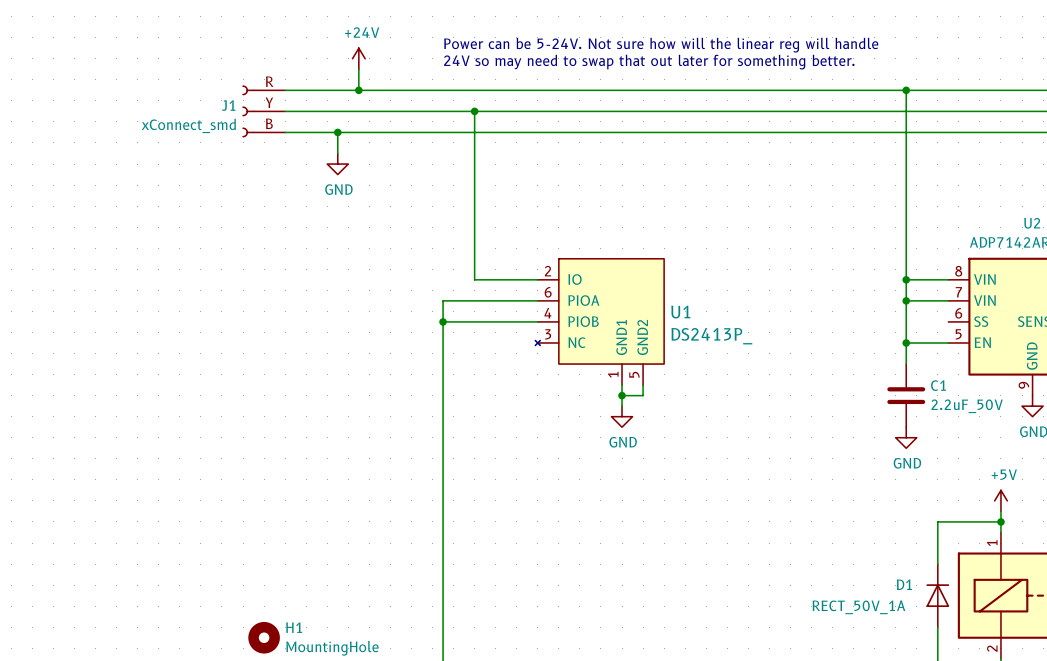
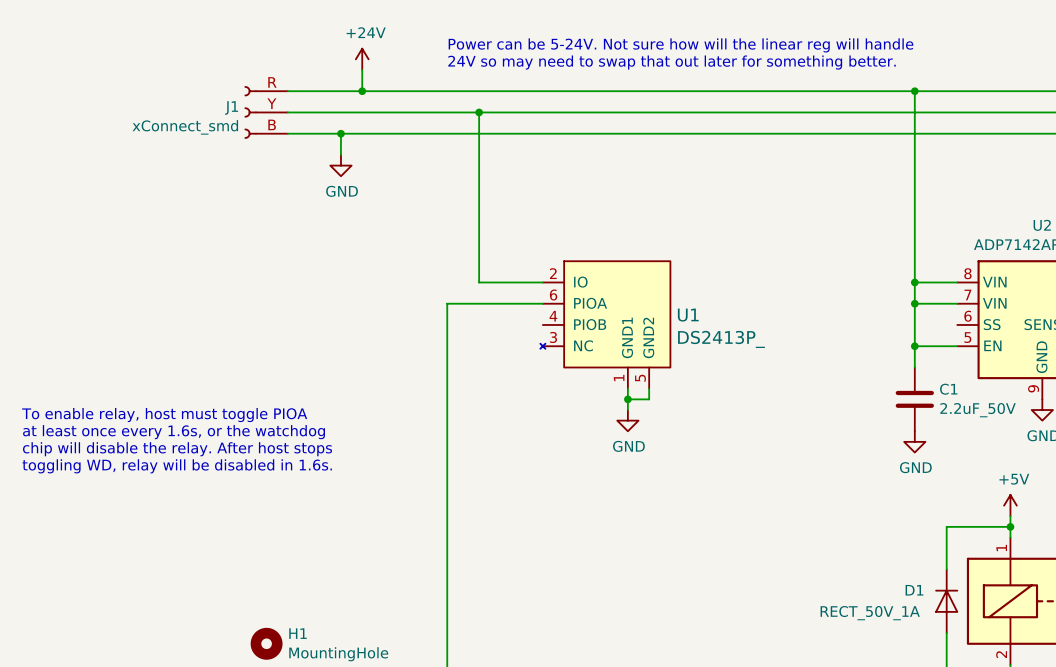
wire: (443, 321) (537, 321) -> none
junction: (443, 321) -> none
text: none -> To enable relay, host must toggle PIOA (164, 415)
text: none -> at least once every 1.6s, or the watchdog (174, 432)
text: none -> chip will disable the relay. After host stops (177, 449)
text: none -> toggling WD, relay will be disabled in 1.6s. (177, 466)

